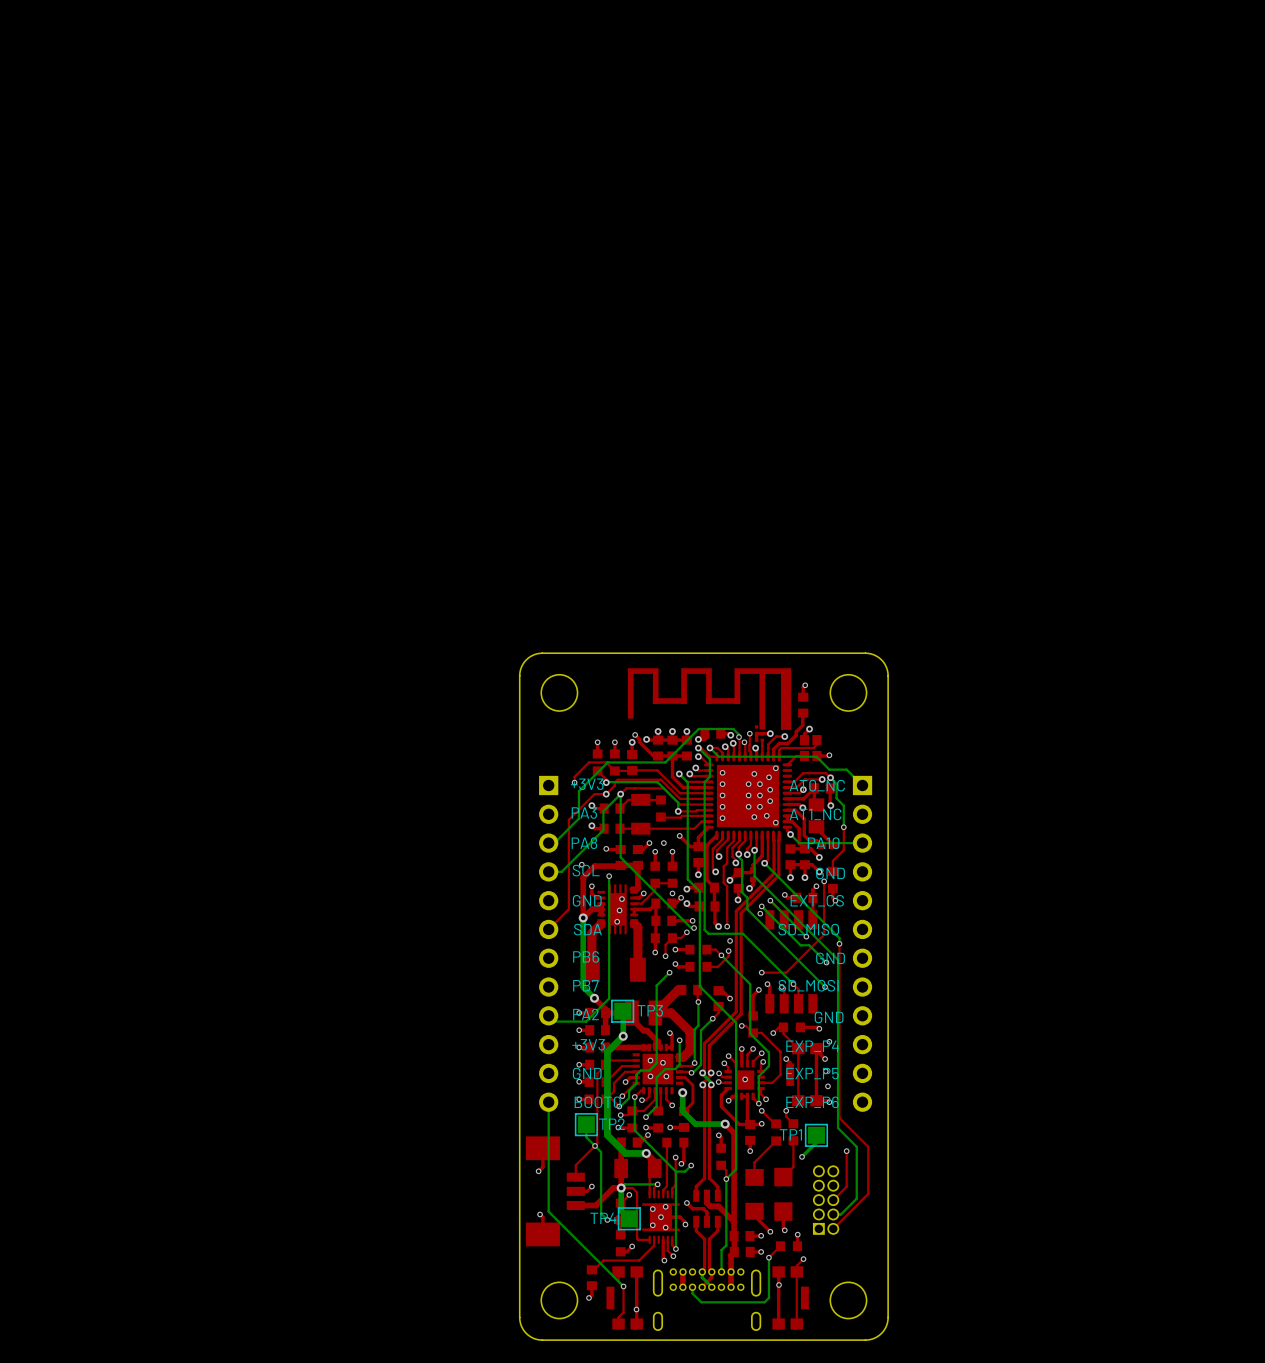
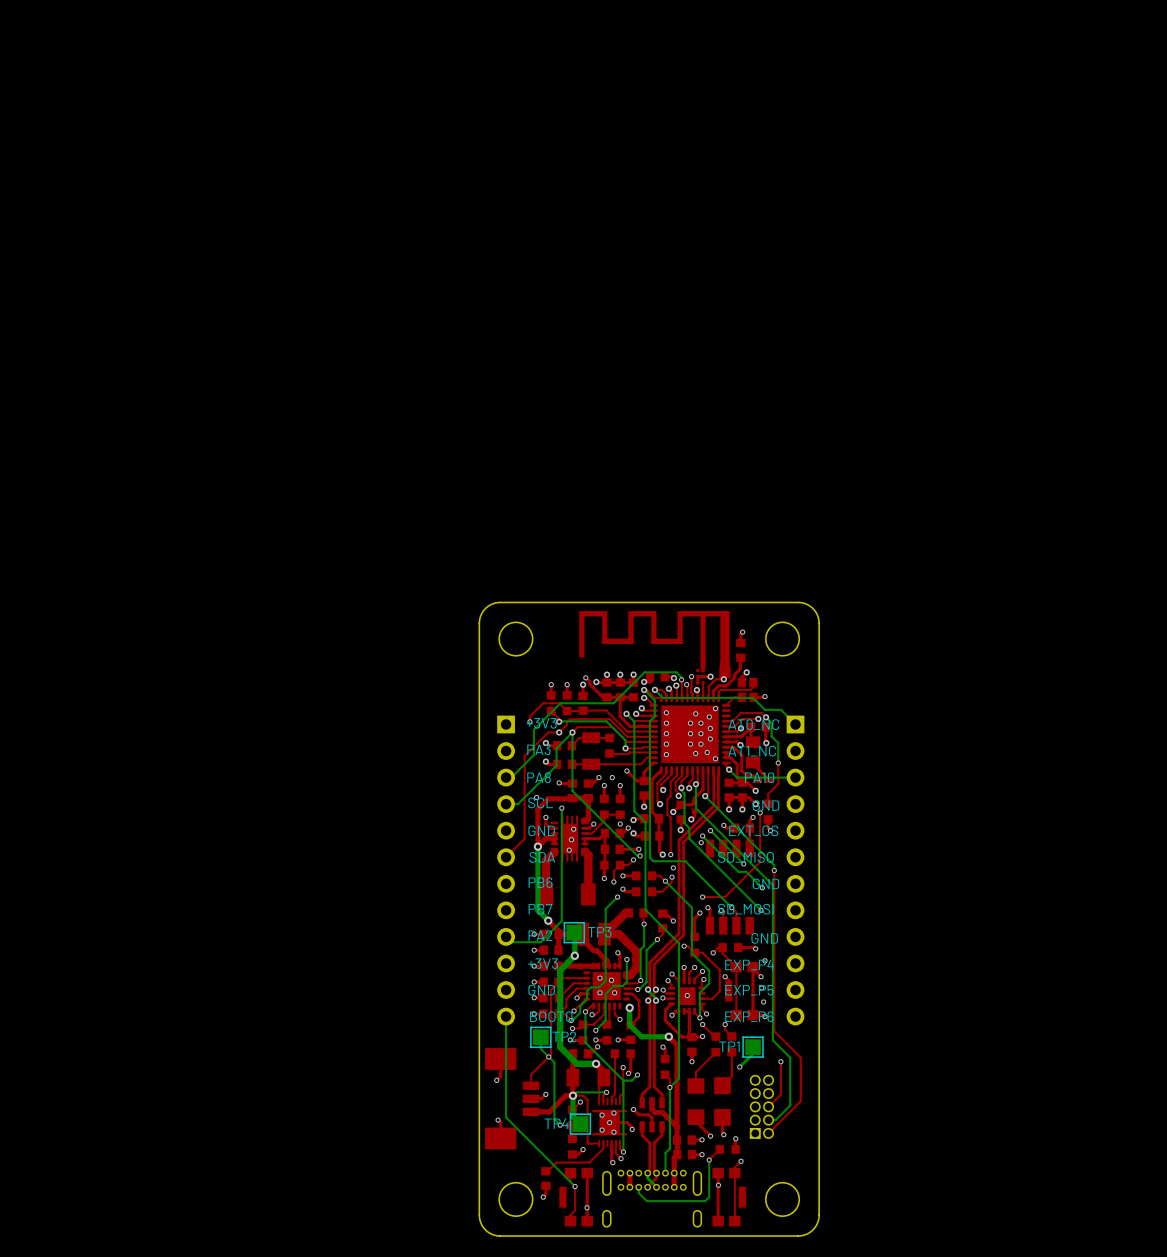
part footprint: [627, 668, 792, 730] -> [579, 611, 731, 679]
top track: none -> (703, 664) (703, 670)

